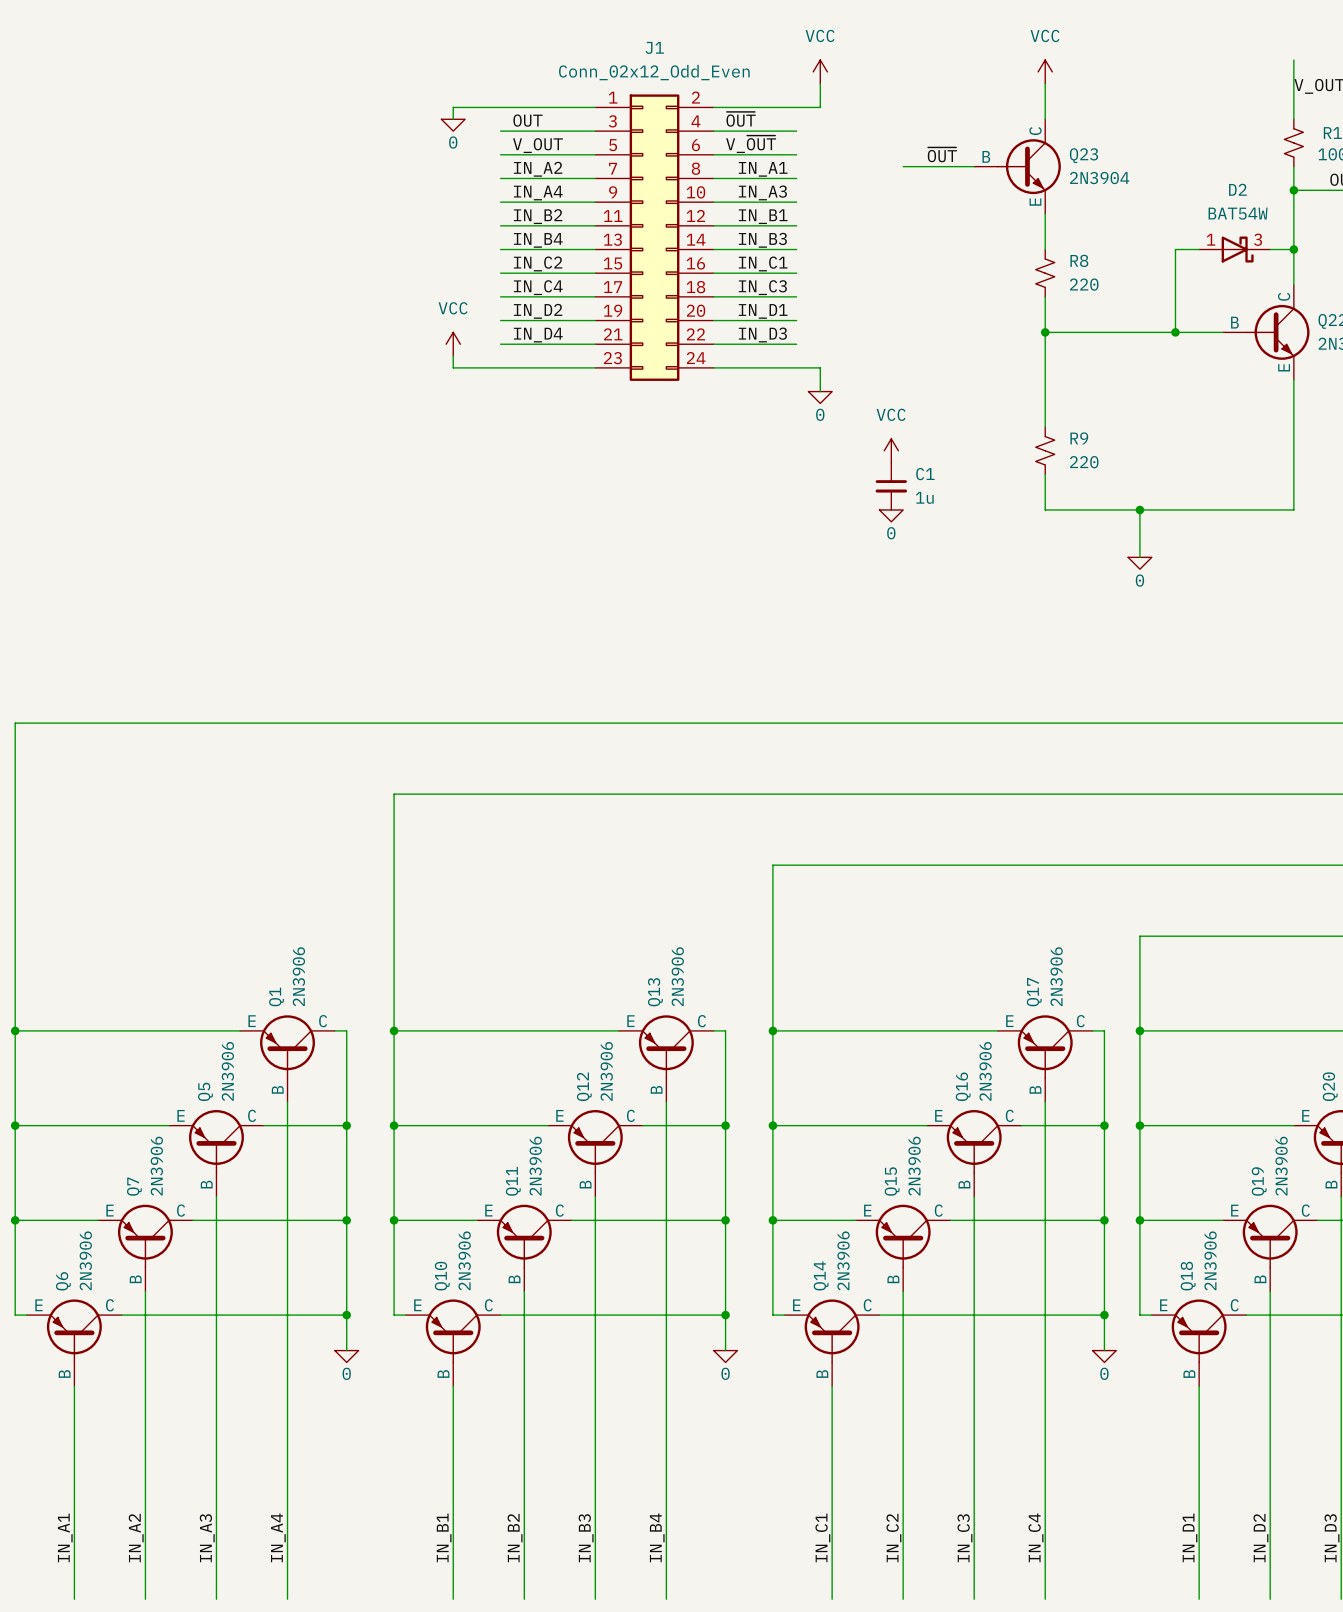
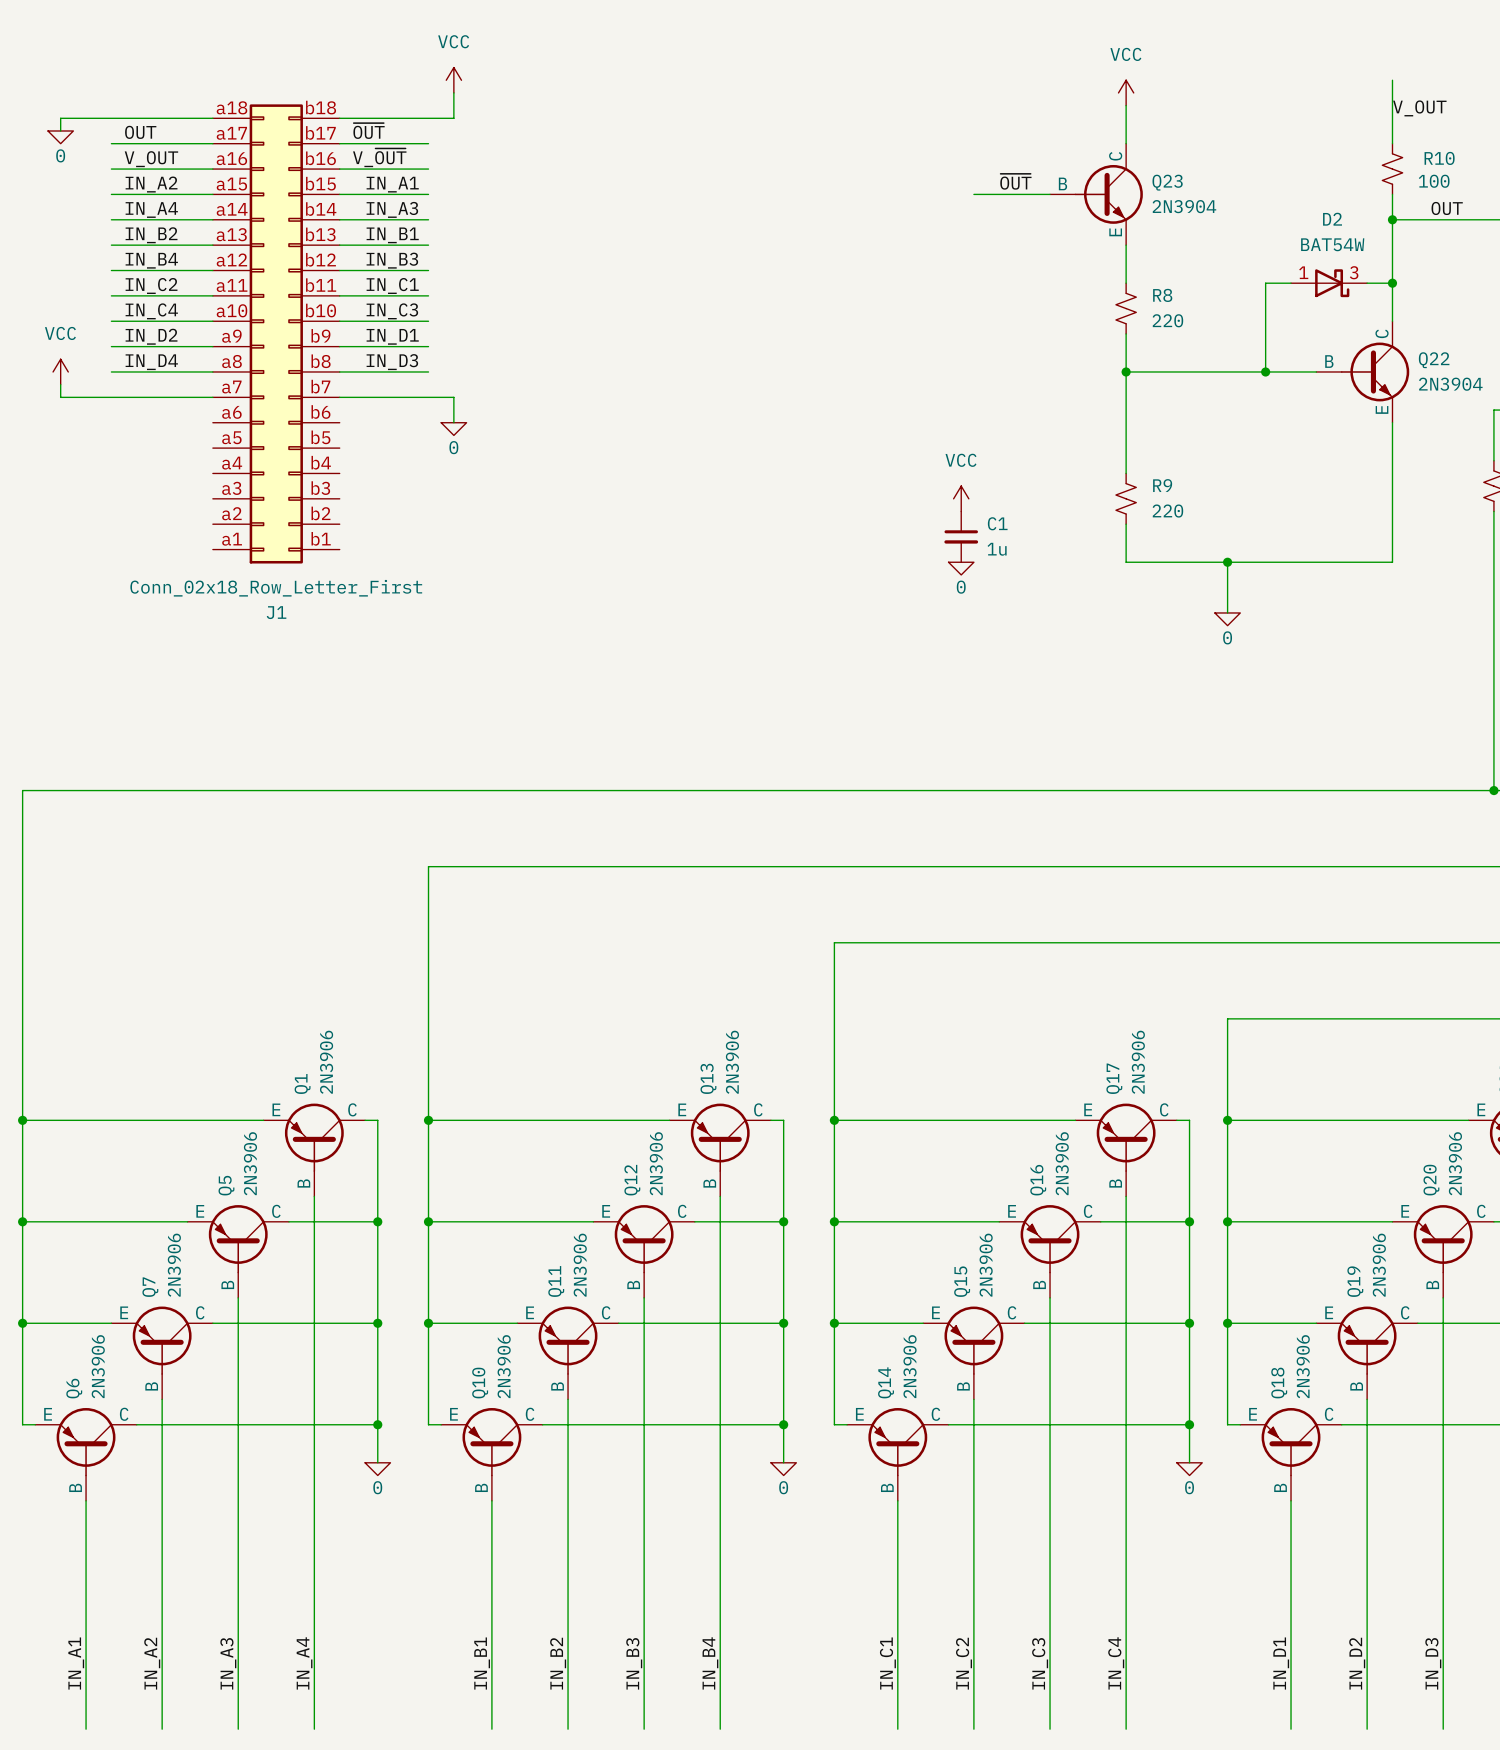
J1 name position: J1 (654, 47) -> J1 (276, 612)
power symbol: none -> VCC (453, 80)
wire: none -> (453, 92) (453, 118) (339, 118)
power symbol: VCC (820, 71) -> none
J1 value: Conn_02x12_Odd_Even (654, 72) -> Conn_02x18_Row_Letter_First (276, 588)
wire: (820, 83) (820, 107) (713, 107) -> none
J1 symbol: [595, 94, 714, 381] -> [212, 104, 340, 564]
wire: none -> (212, 118) (60, 118) (60, 130)
label: none -> ~{OUT} (369, 131)
wire: (595, 107) (453, 107) (453, 119) -> none
label: none -> OUT (140, 132)
power symbol: none -> 0 (60, 137)
wire: none -> (111, 143) (212, 143)
wire: none -> (339, 143) (428, 143)
label: ~{OUT} (741, 119) -> none
label: OUT (527, 120) -> none
power symbol: 0 (453, 125) -> none
wire: (500, 131) (595, 131) -> none
wire: (713, 131) (796, 131) -> none
label: none -> V_~{OUT} (379, 157)
label: none -> V_OUT (151, 159)
wire: none -> (111, 169) (212, 169)
wire: none -> (339, 169) (428, 169)
label: V_~{OUT} (751, 144) -> none
label: V_OUT (537, 145) -> none
wire: (500, 154) (595, 154) -> none
wire: (713, 154) (796, 154) -> none
label: none -> IN_A2 (151, 184)
label: none -> IN_A1 (392, 184)
wire: none -> (111, 194) (212, 194)
wire: none -> (339, 194) (428, 194)
label: IN_A2 (538, 169) -> none
label: IN_A1 (763, 169) -> none
wire: (500, 178) (595, 178) -> none
wire: (713, 178) (796, 178) -> none
label: none -> IN_A4 (151, 210)
label: none -> IN_A3 (392, 209)
wire: none -> (111, 219) (212, 219)
wire: none -> (339, 219) (428, 219)
label: IN_A3 (762, 192) -> none
label: IN_A4 (538, 193) -> none
wire: (500, 202) (595, 202) -> none
wire: (713, 202) (796, 202) -> none
label: none -> IN_B2 (151, 235)
label: none -> IN_B1 (392, 235)
wire: none -> (111, 245) (212, 245)
wire: none -> (339, 245) (428, 245)
label: IN_B2 (538, 216) -> none
label: IN_B1 (763, 216) -> none
wire: (500, 225) (595, 225) -> none
wire: (713, 225) (796, 225) -> none
label: none -> IN_B4 (151, 260)
label: none -> IN_B3 (392, 260)
wire: none -> (111, 270) (212, 270)
wire: none -> (339, 270) (428, 270)
label: IN_B4 (538, 240) -> none
label: IN_B3 (762, 240) -> none
wire: (500, 249) (595, 249) -> none
wire: (713, 249) (796, 249) -> none
label: none -> IN_C2 (151, 285)
label: none -> IN_C1 (392, 285)
wire: none -> (111, 295) (212, 295)
wire: none -> (339, 295) (428, 295)
label: IN_C2 (538, 263) -> none
label: IN_C1 (763, 263) -> none
wire: (500, 273) (595, 273) -> none
wire: (713, 273) (796, 273) -> none
label: none -> IN_C4 (151, 311)
label: none -> IN_C3 (392, 311)
wire: none -> (111, 321) (212, 321)
wire: none -> (339, 321) (428, 321)
label: IN_C4 (538, 287) -> none
label: IN_C3 (762, 287) -> none
wire: (500, 296) (595, 296) -> none
wire: (713, 296) (796, 296) -> none
label: none -> IN_D2 (151, 336)
label: none -> IN_D1 (392, 336)
wire: none -> (111, 346) (212, 346)
wire: none -> (339, 346) (428, 346)
label: IN_D2 (538, 311) -> none
label: IN_D1 (763, 311) -> none
wire: (500, 320) (595, 320) -> none
wire: (713, 320) (796, 320) -> none
label: none -> IN_D4 (151, 362)
label: none -> IN_D3 (392, 362)
power symbol: none -> VCC (60, 371)
wire: none -> (111, 371) (212, 371)
wire: none -> (339, 371) (428, 371)
label: IN_D4 (538, 335) -> none
label: IN_D3 (762, 335) -> none
wire: none -> (60, 384) (60, 397) (212, 397)
power symbol: VCC (453, 344) -> none
wire: (500, 344) (595, 344) -> none
wire: (713, 344) (796, 344) -> none
wire: none -> (339, 397) (453, 397) (453, 422)
wire: (453, 356) (453, 367) (595, 367) -> none
wire: (713, 367) (820, 367) (820, 391) -> none
power symbol: none -> 0 (453, 429)
power symbol: 0 (820, 397) -> none

